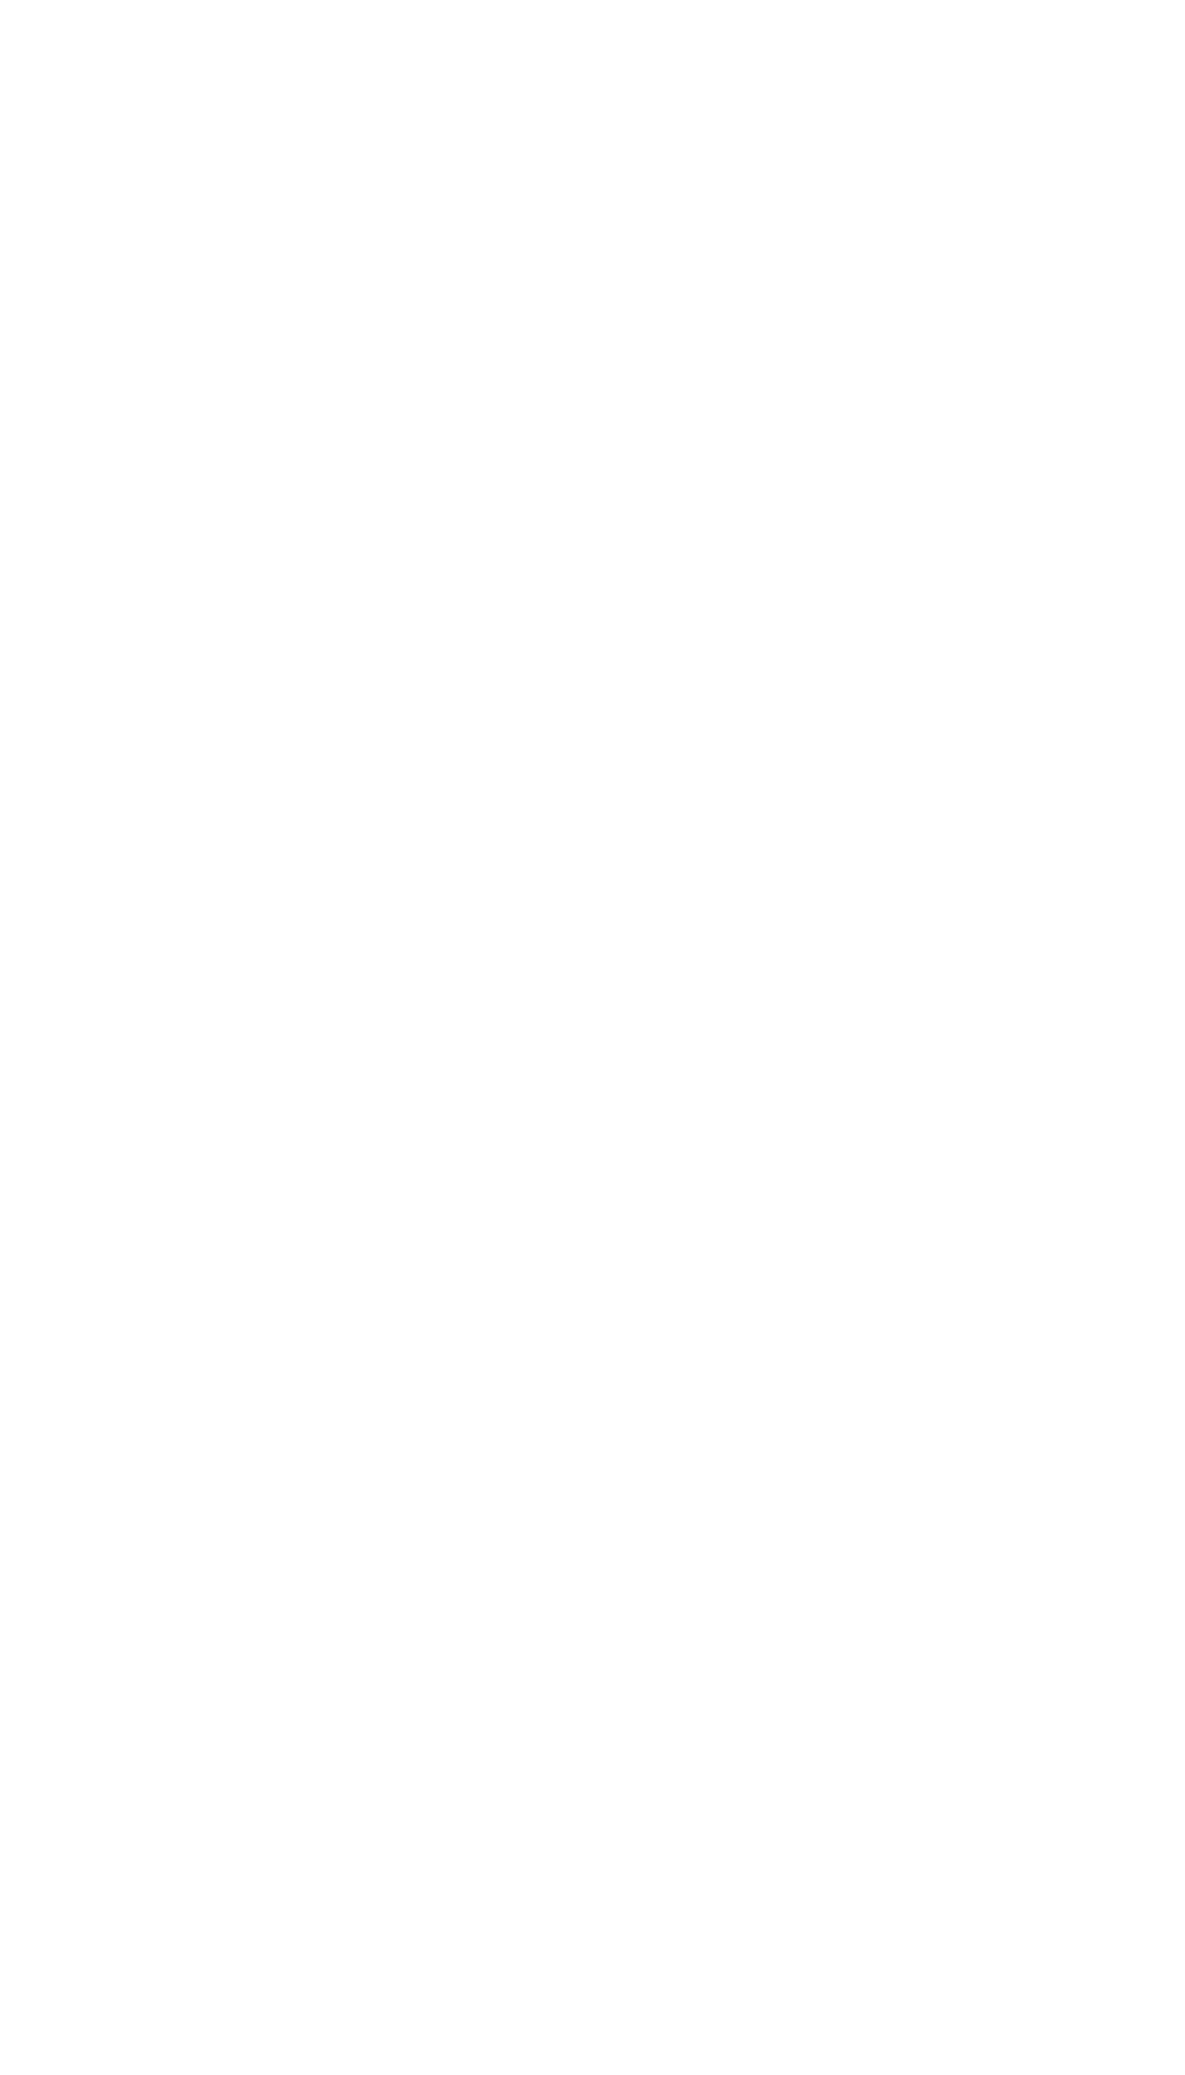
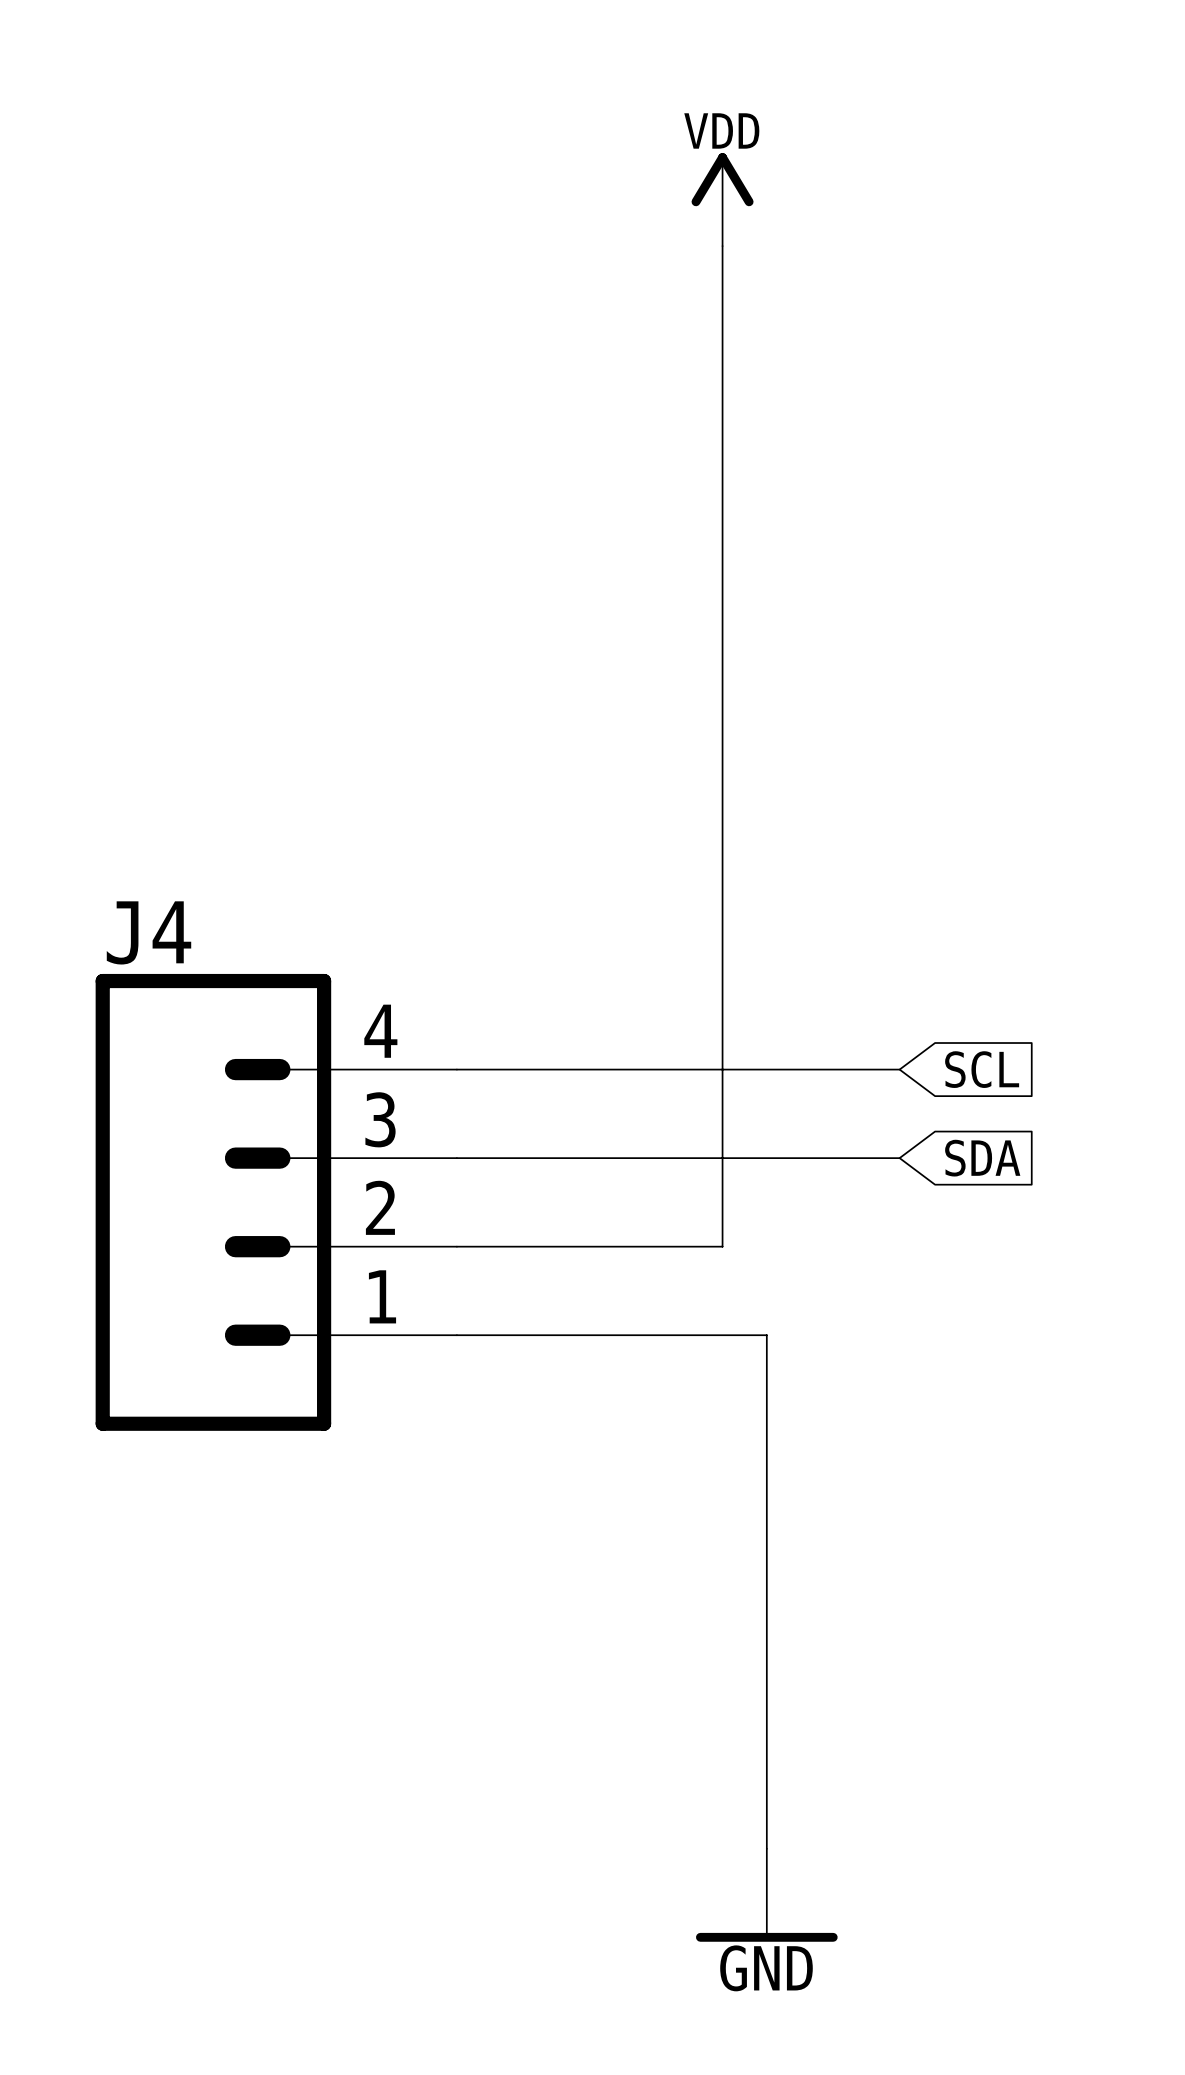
power symbol: none -> VDD (722, 199)
wire: none -> (722, 246) (722, 1246) (456, 1246)
wire: none -> (456, 1069) (899, 1069)
global label: none -> SCL (982, 1069)
wire: none -> (456, 1158) (899, 1158)
global label: none -> SDA (982, 1158)
J4: none -> (276, 1202)
wire: none -> (456, 1335) (766, 1335) (766, 1848)
power symbol: none -> GND (766, 1895)

